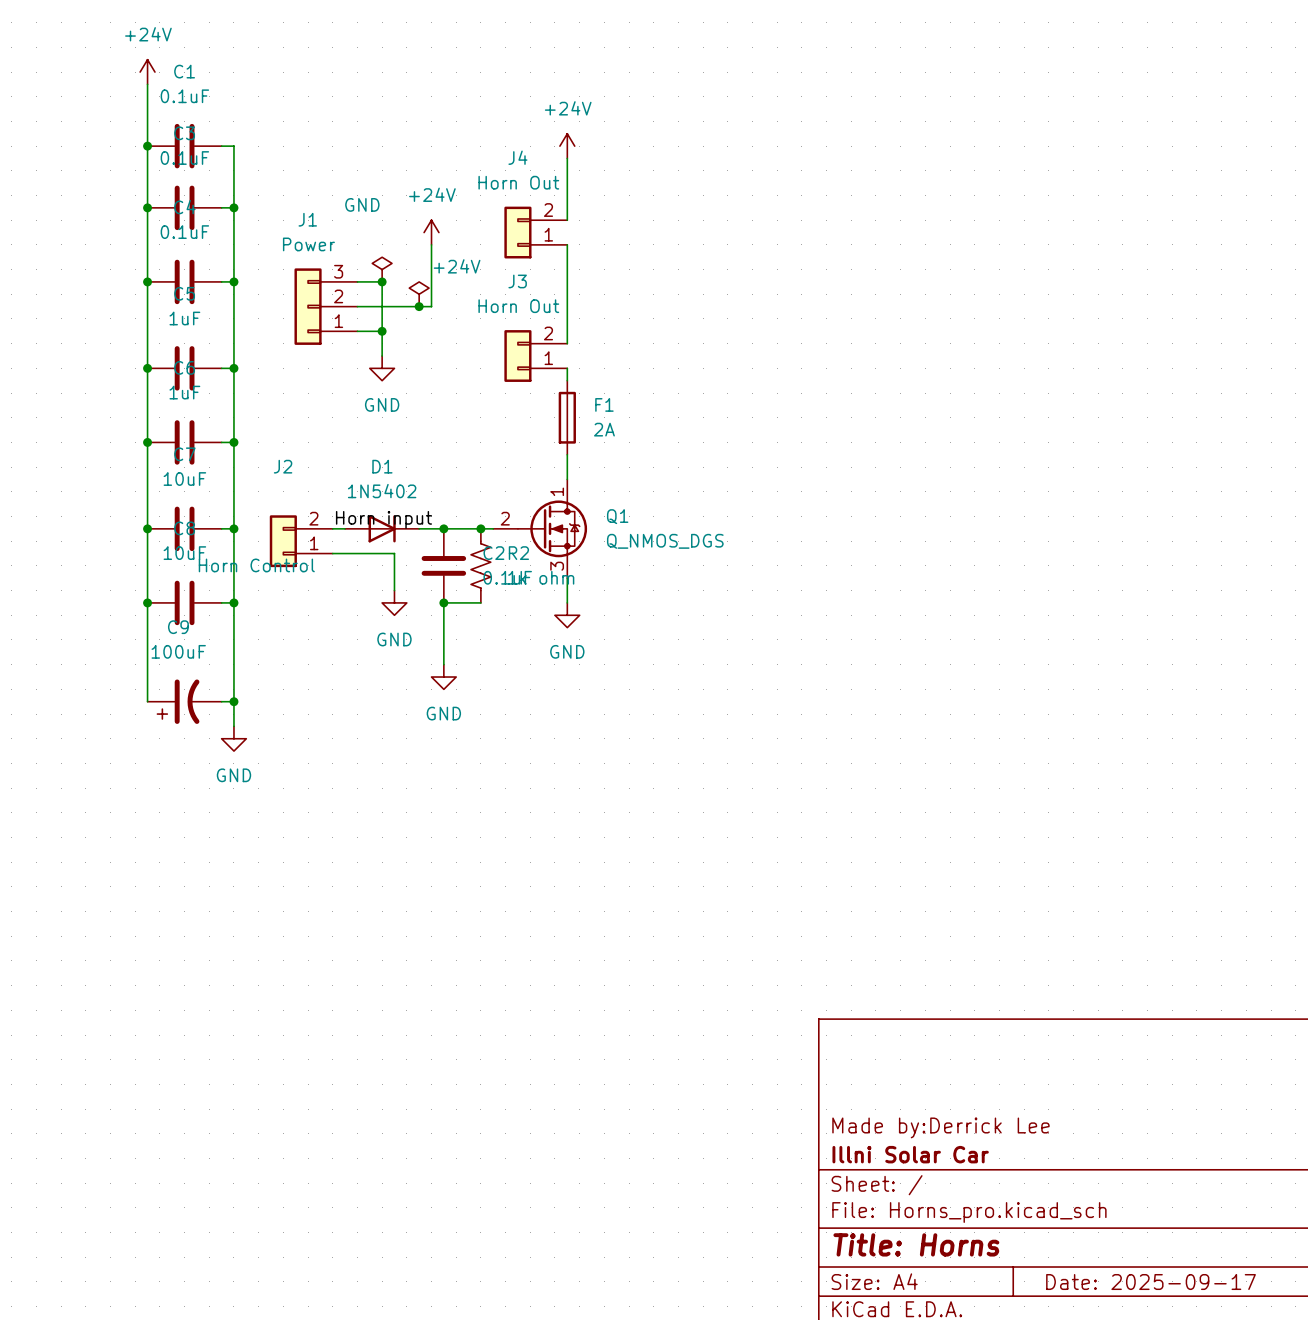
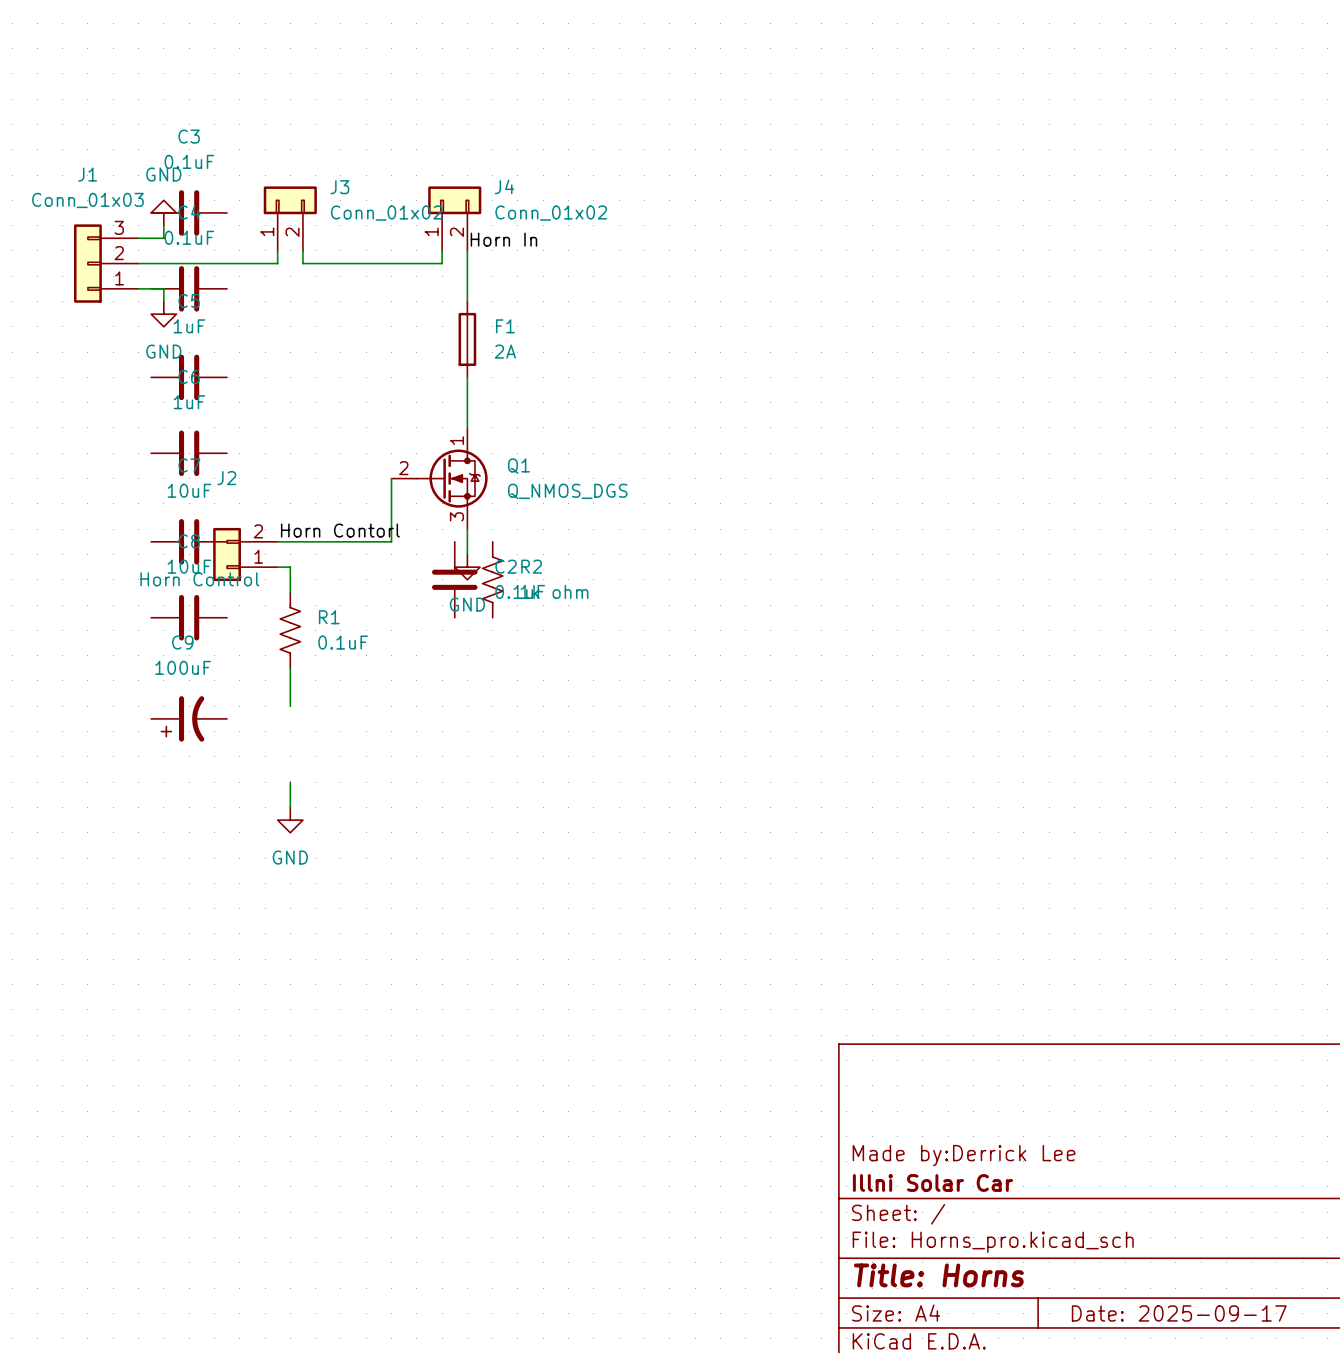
power symbol: +24V (147, 72) -> none
wire: (147, 84) (147, 701) -> none
junction: (147, 146) -> none
C1: 0.1uF (184, 146) -> none
wire: (221, 146) (233, 146) (233, 726) -> none
power symbol: +24V (567, 146) -> none
J4 name position: J4 (517, 157) -> J4 (504, 186)
wire: (567, 158) (567, 220) -> none
J4 value: Horn Out (518, 182) -> Conn_01x02 (551, 213)
junction: (147, 207) -> none
power symbol: none -> GND (163, 212)
wire: (221, 207) (233, 207) -> none
junction: (233, 207) -> none
wire: none -> (163, 225) (163, 238) (138, 238)
power symbol: +24V (431, 232) -> none
J4 rotation: 0° (517, 232) -> 90° clockwise (454, 200)
J4 position: (535, 232) -> (454, 218)
label: none -> Horn In (503, 239)
wire: none -> (277, 250) (277, 263) (138, 263)
J1 value: Power (308, 244) -> Conn_01x03 (87, 200)
wire: none -> (467, 250) (467, 301)
wire: (567, 244) (567, 343) -> none
wire: (431, 257) (431, 306) (357, 306) -> (442, 263) (302, 263) (302, 250)
power symbol: GND (382, 269) -> none
wire: none -> (138, 288) (163, 288) (163, 301)
junction: (147, 281) -> none
wire: (221, 281) (233, 281) -> none
junction: (233, 281) -> none
wire: (357, 281) (382, 281) (382, 356) -> none
junction: (382, 281) -> none
J3 name position: J3 (517, 281) -> J3 (339, 187)
power symbol: +24V (419, 294) -> none
power symbol: none -> GND (163, 314)
J1 position: (325, 306) -> (106, 263)
junction: (419, 306) -> none
J3 value: Horn Out (518, 306) -> Conn_01x02 (386, 213)
wire: (357, 331) (382, 331) -> none
junction: (382, 331) -> none
J3 rotation: 0° (517, 356) -> 90° clockwise (290, 200)
J3 position: (535, 356) -> (290, 218)
junction: (147, 368) -> none
wire: (221, 368) (233, 368) -> none
junction: (233, 368) -> none
power symbol: GND (382, 368) -> none
wire: none -> (467, 377) (467, 427)
wire: (567, 368) (567, 380) -> none
F1 position: (567, 417) -> (467, 339)
junction: (147, 442) -> none
wire: (221, 442) (233, 442) -> none
junction: (233, 442) -> none
wire: (567, 454) (567, 479) -> (467, 529) (467, 554)
wire: none -> (391, 478) (391, 541) (353, 541)
label: Horn input (383, 519) -> Horn Contorl (340, 530)
junction: (147, 528) -> none
junction: (233, 528) -> none
D1: 1N5402 (382, 528) -> none
wire: (419, 528) (493, 528) -> none
junction: (443, 528) -> none
junction: (480, 528) -> none
Q1 position: (540, 528) -> (439, 478)
J2 position: (301, 541) -> (245, 554)
wire: (332, 553) (394, 553) (394, 590) -> none
power symbol: none -> GND (467, 567)
wire: (567, 578) (567, 602) -> none
junction: (147, 602) -> none
wire: (221, 602) (233, 602) -> none
junction: (233, 602) -> none
power symbol: GND (394, 602) -> none
junction: (443, 602) -> none
wire: (480, 602) (443, 602) (443, 664) -> none
R1: none -> 0.1uF (290, 630)
power symbol: GND (567, 615) -> none
wire: none -> (290, 668) (290, 706)
power symbol: GND (443, 677) -> none
wire: (221, 701) (233, 701) -> none
junction: (233, 701) -> none
power symbol position: GND (233, 738) -> GND (290, 820)
wire: none -> (290, 782) (290, 807)

